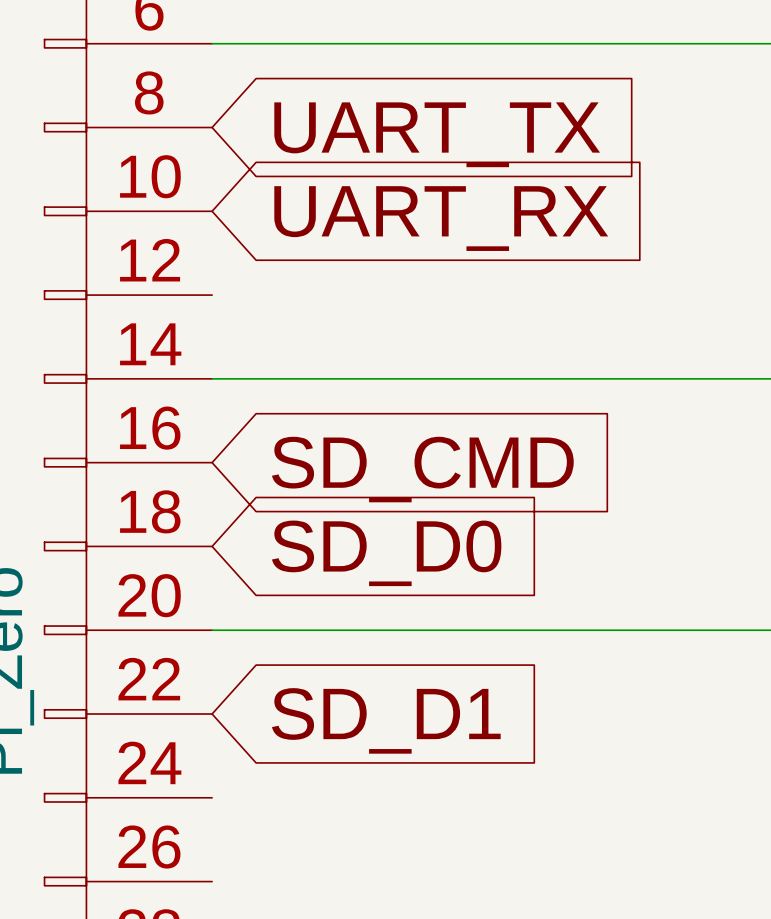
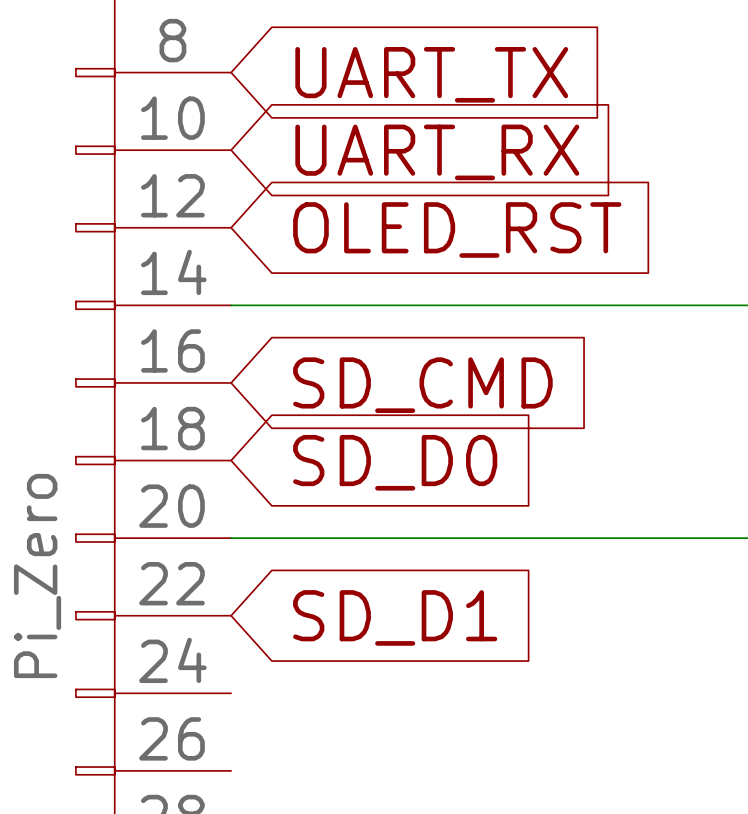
global label: none -> OLED_RST (457, 229)

